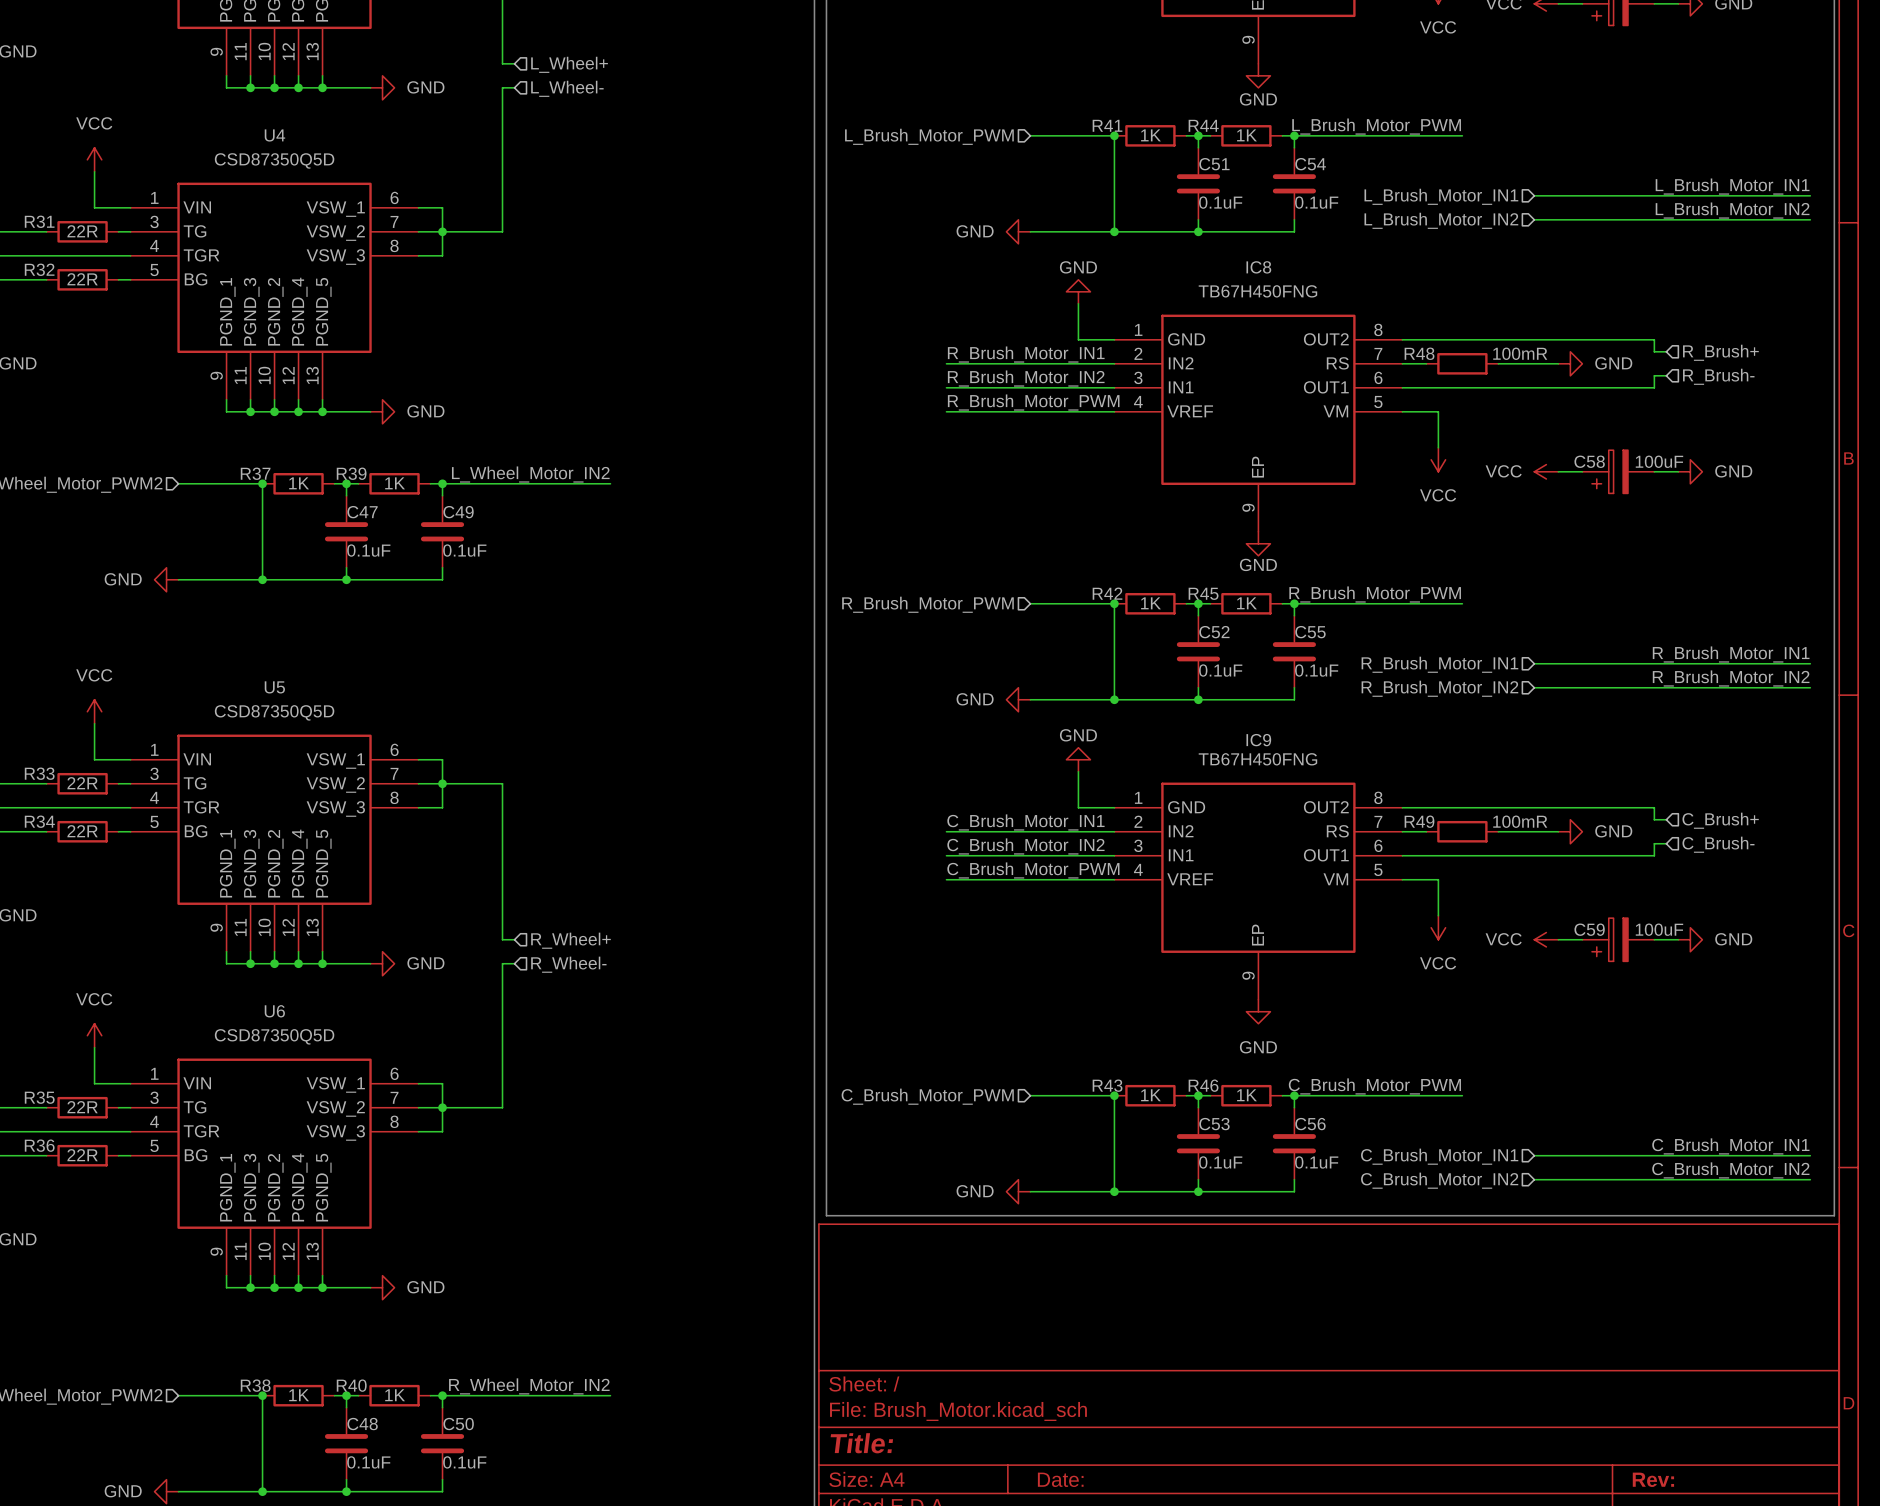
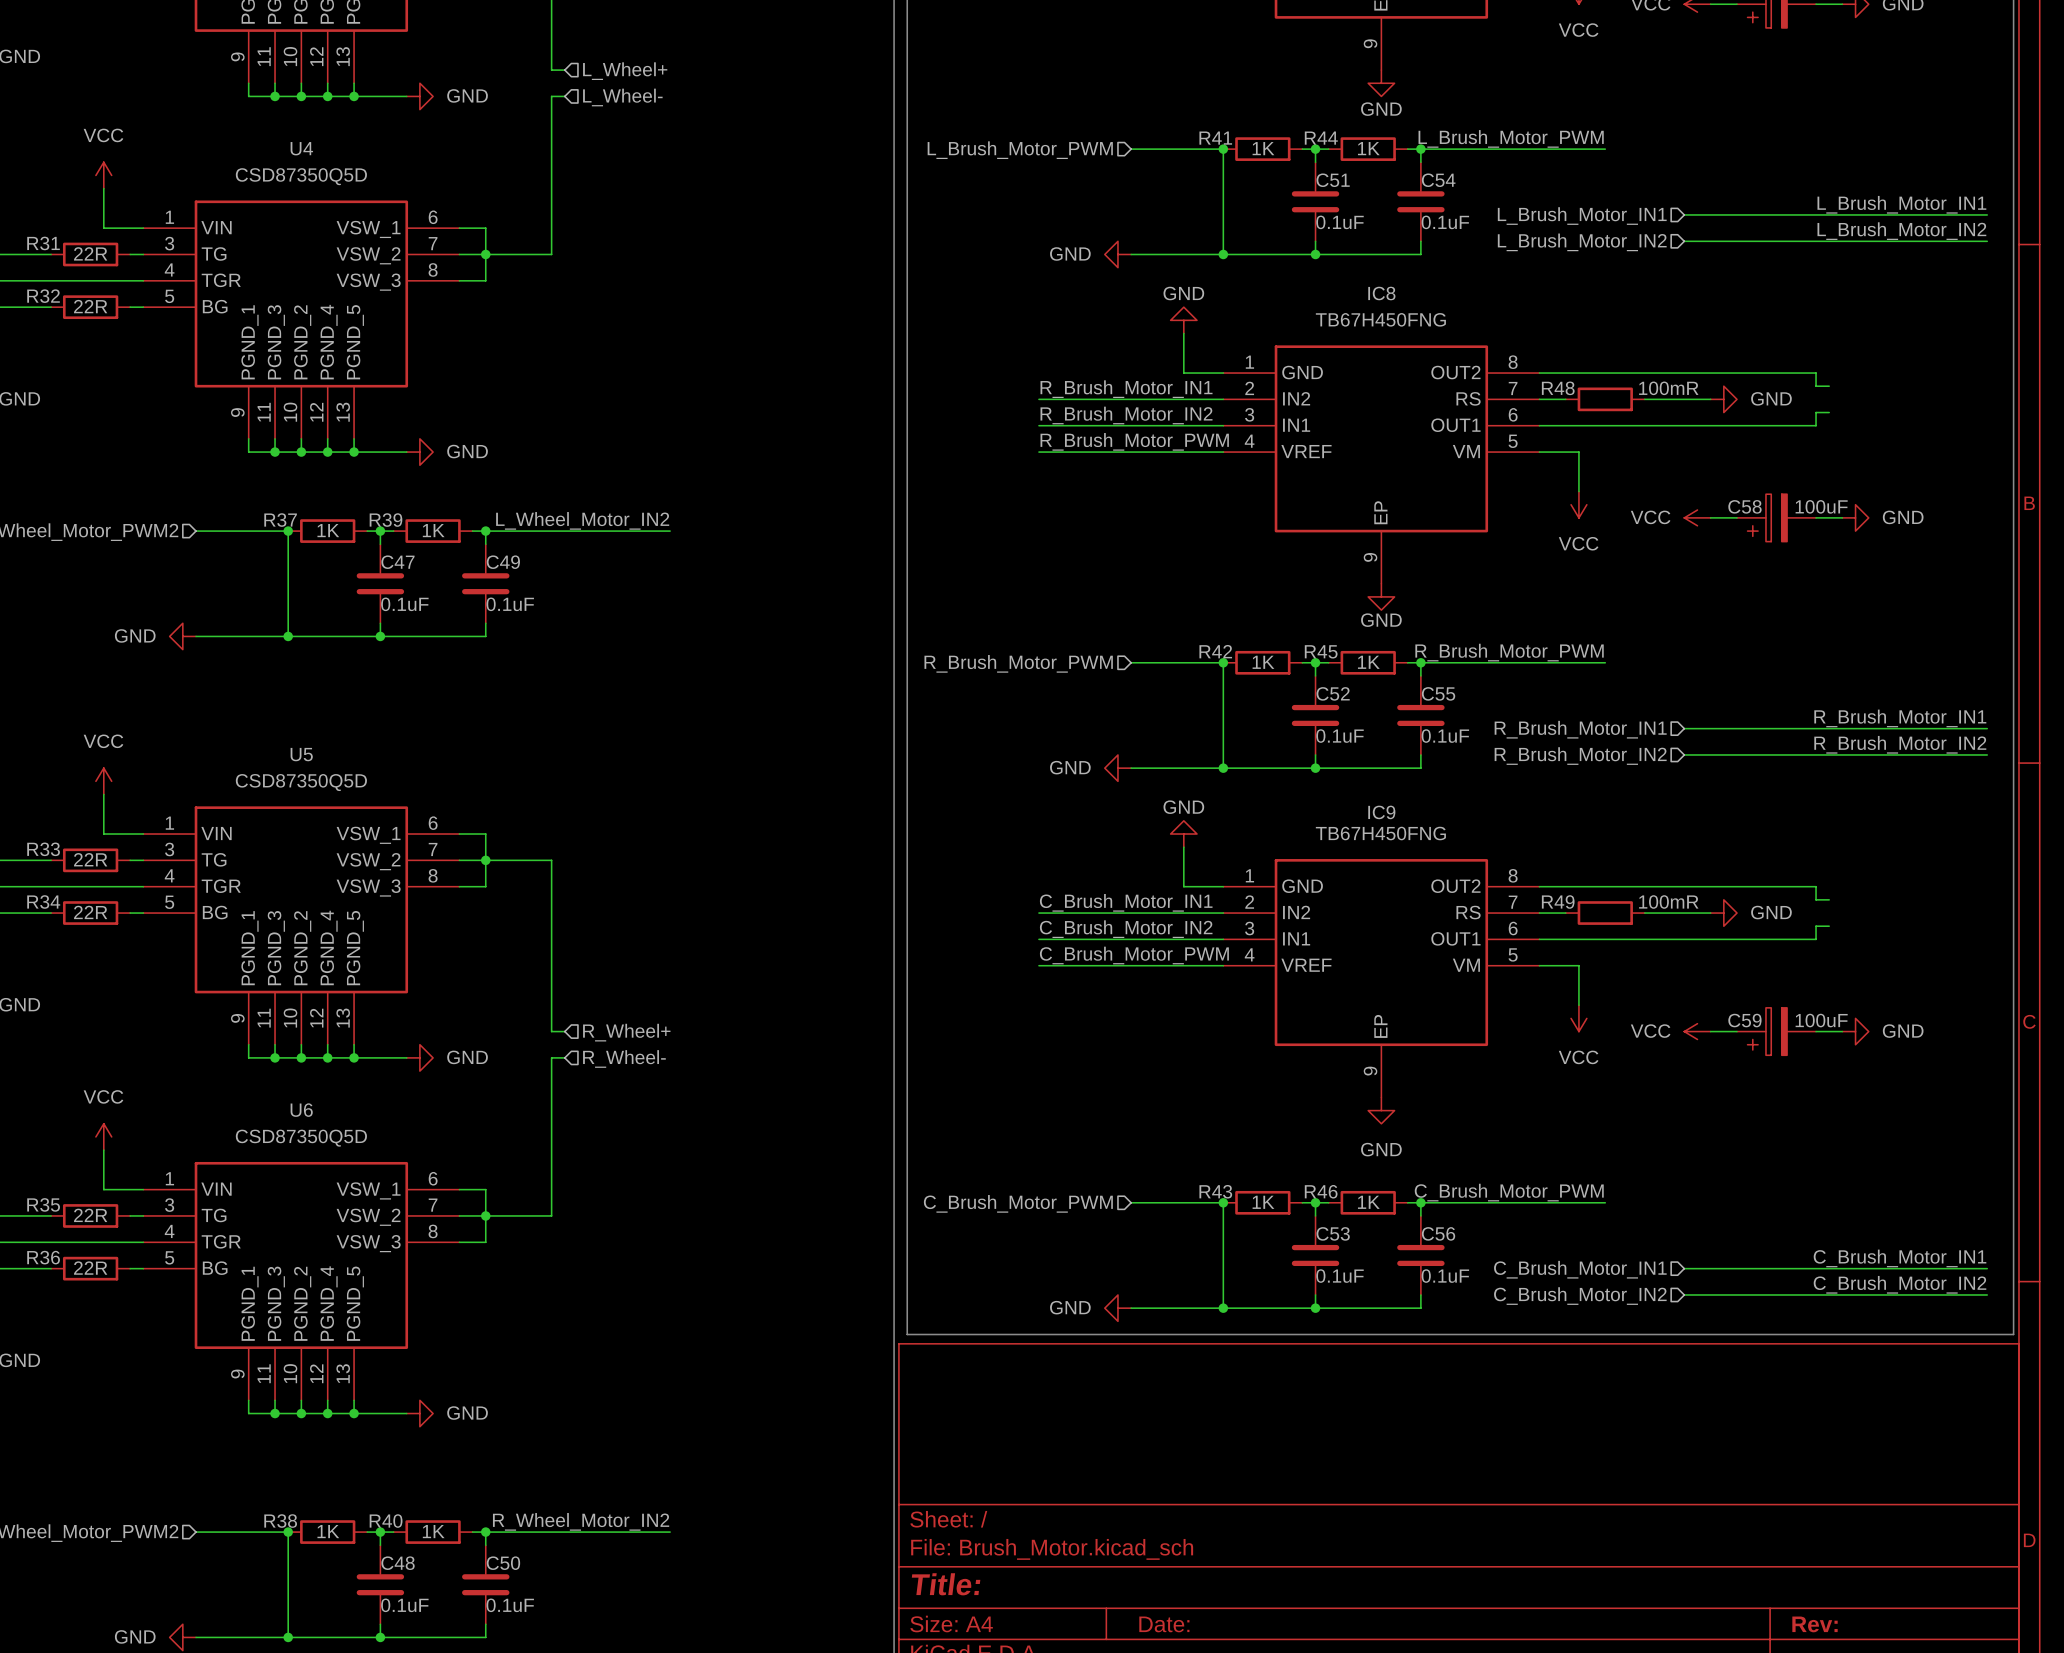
hierarchical label: R_Brush+ (1720, 352) -> none
hierarchical label: R_Brush- (1718, 376) -> none
hierarchical label: C_Brush+ (1720, 820) -> none
hierarchical label: C_Brush- (1718, 844) -> none

